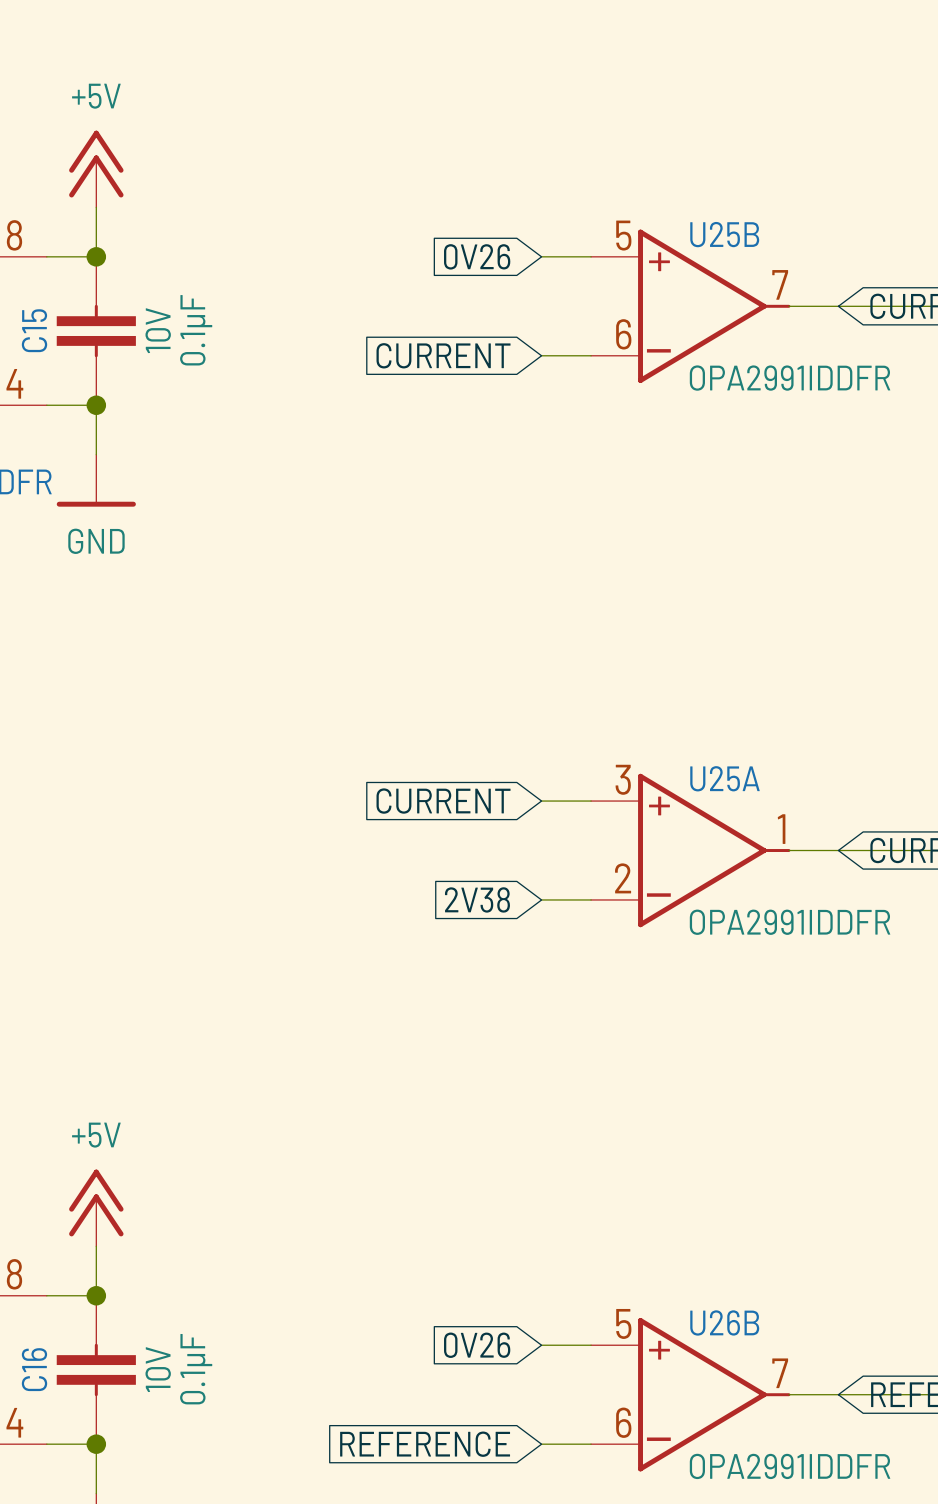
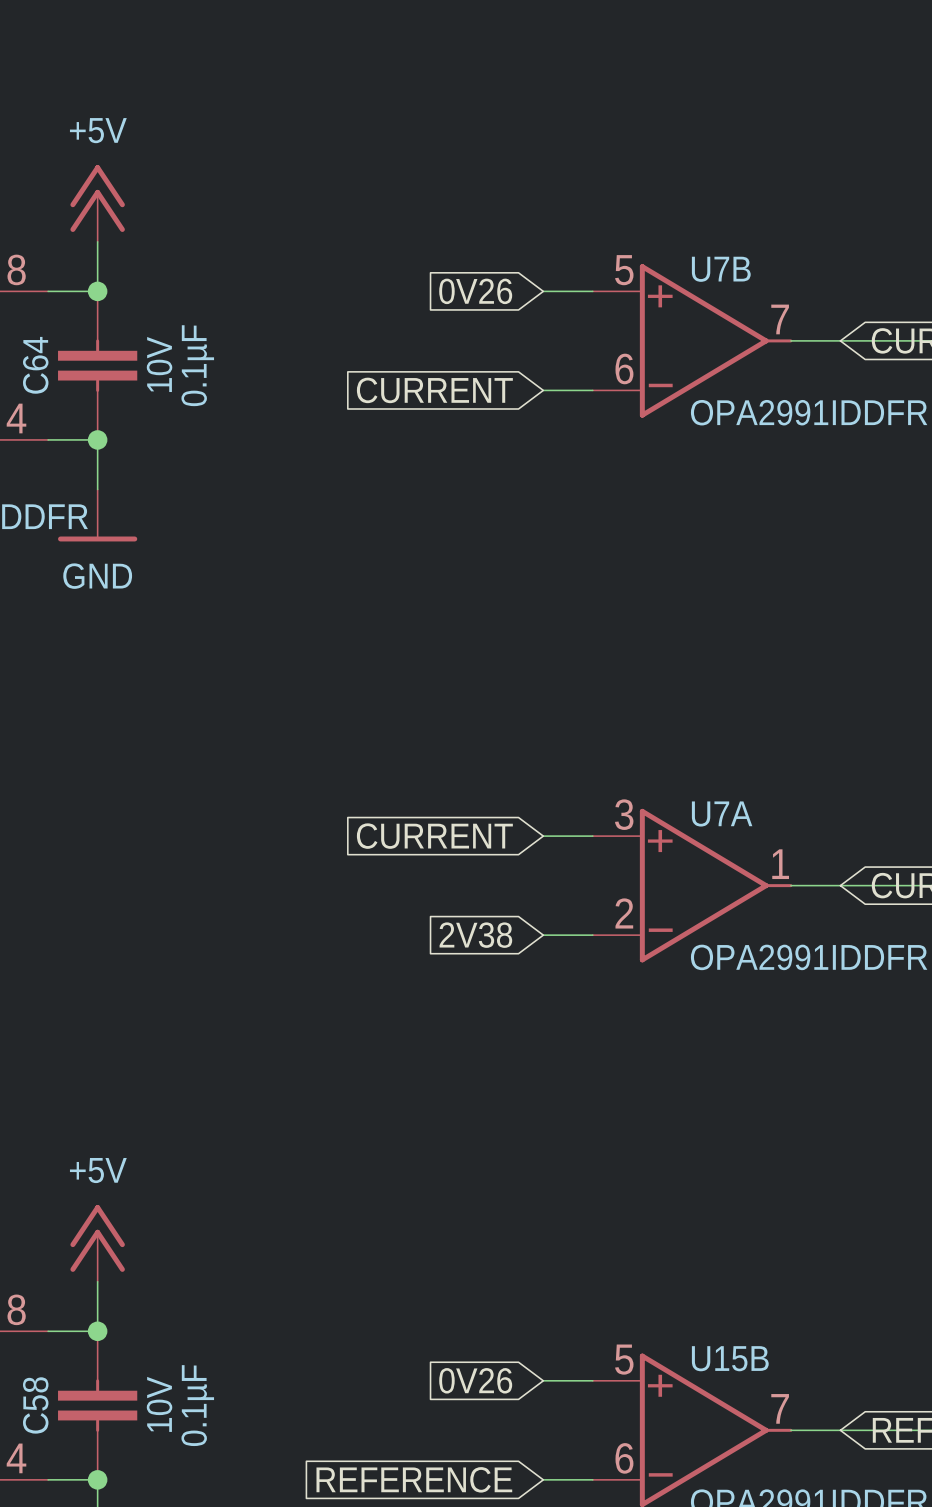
U25B name: U25B (724, 234) -> U7B (721, 269)
C15 name: C15 (34, 330) -> C64 (35, 365)
U25A name: U25A (724, 778) -> U7A (722, 813)
U26B name: U26B (724, 1322) -> U15B (730, 1358)
C16 name: C16 (34, 1369) -> C58 (35, 1405)

